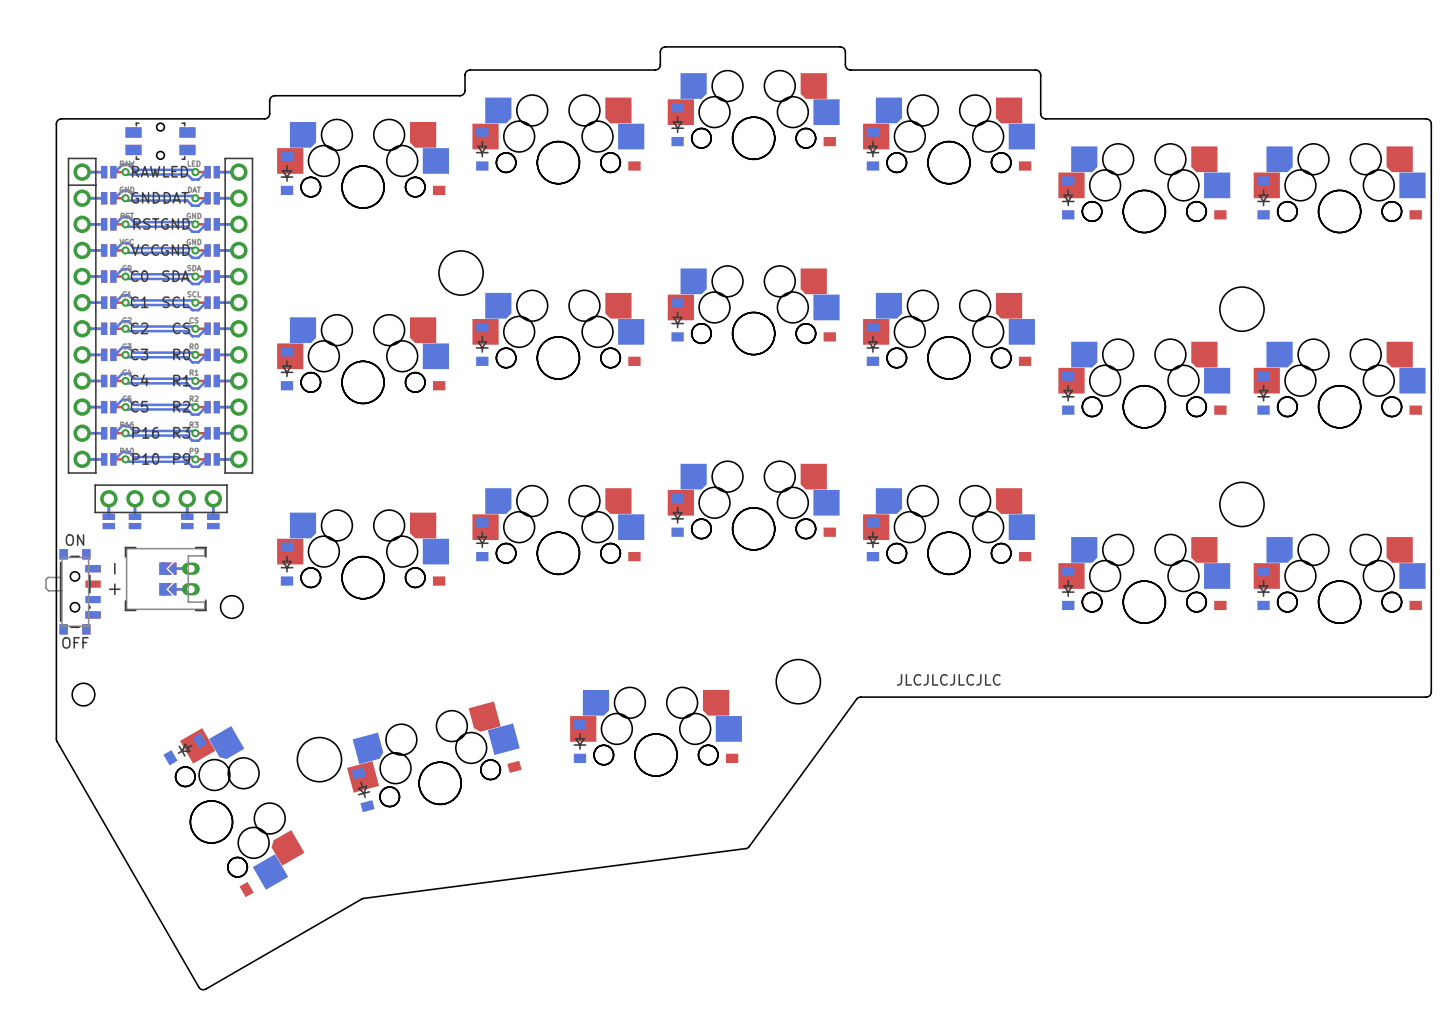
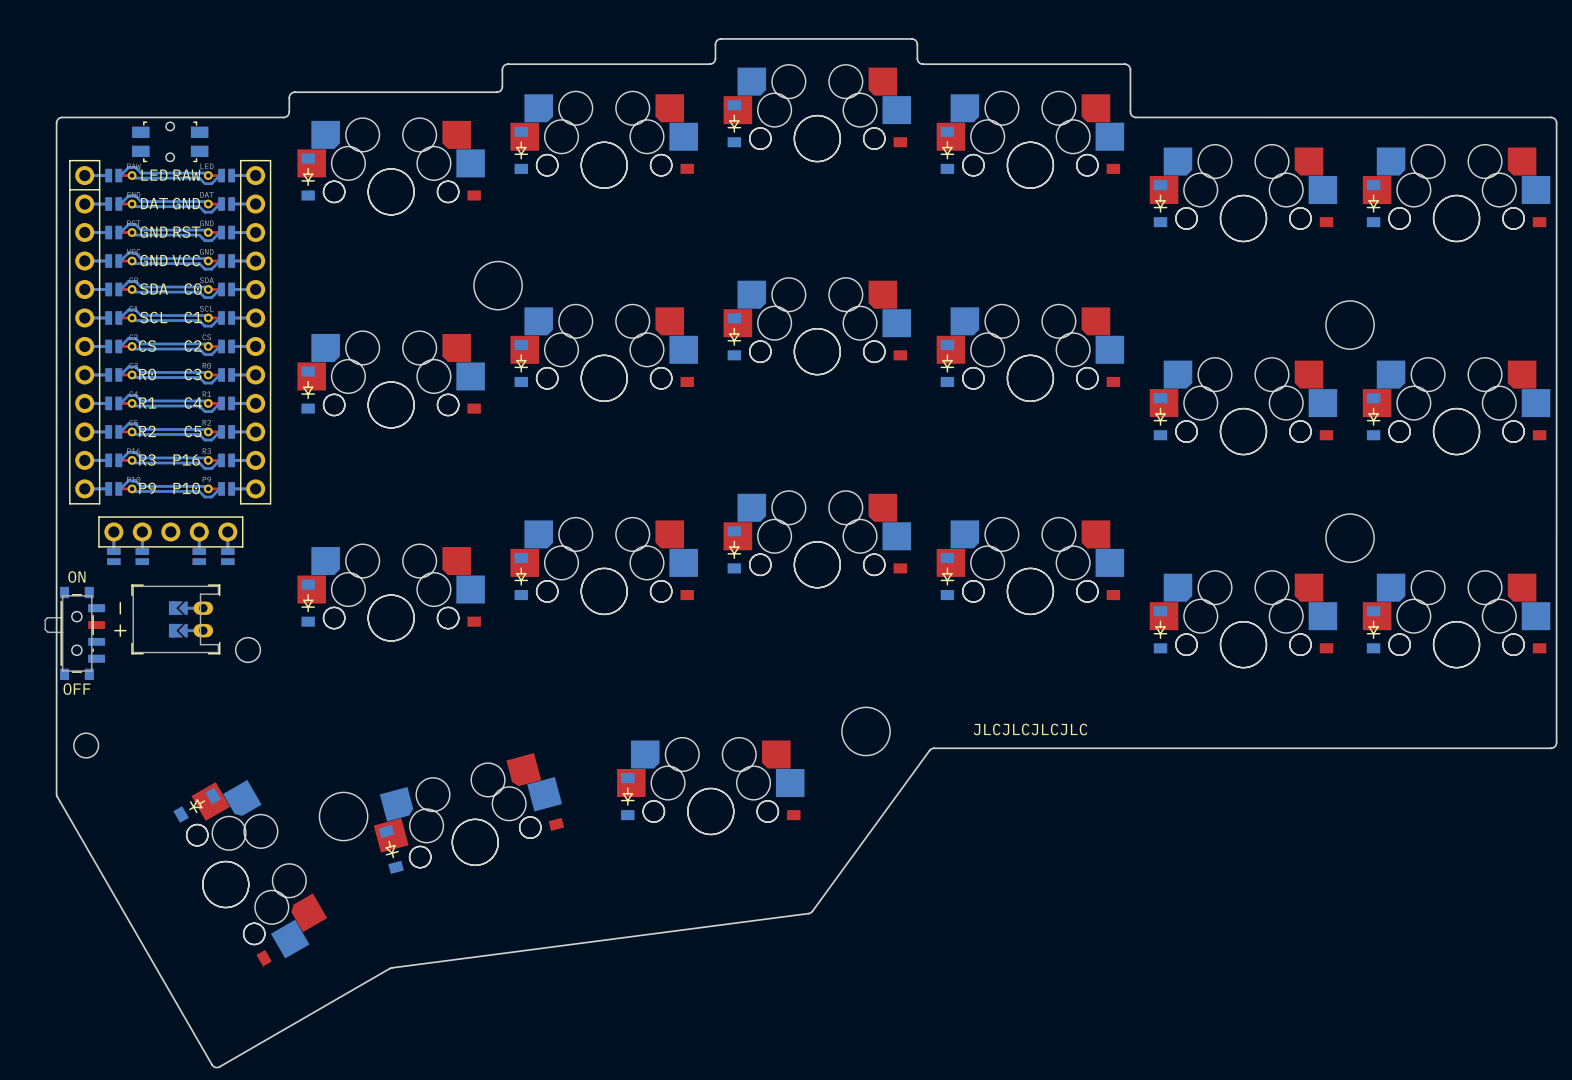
part footprint: [67, 157, 254, 474] -> [69, 159, 272, 505]

